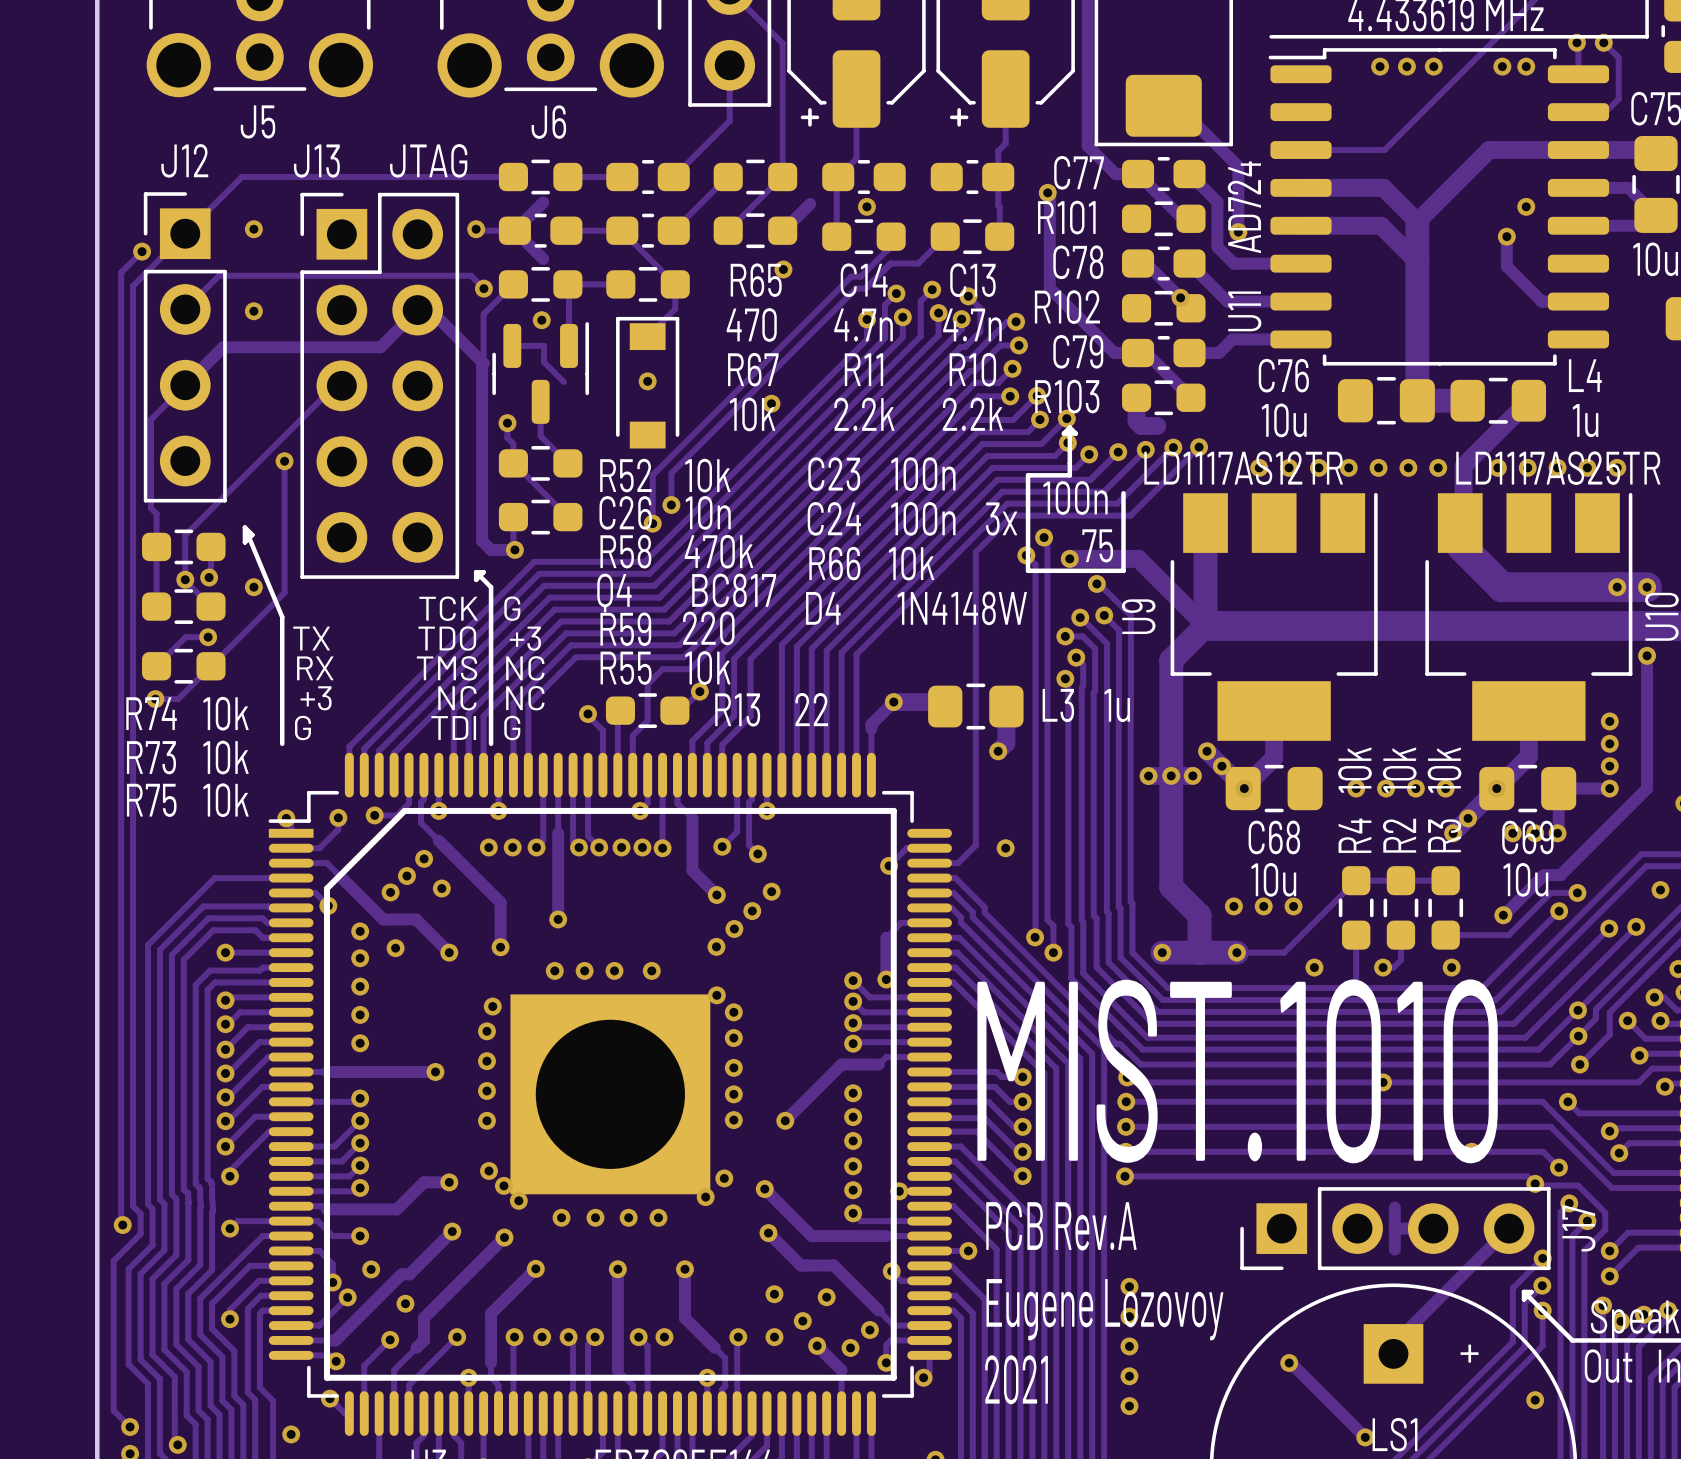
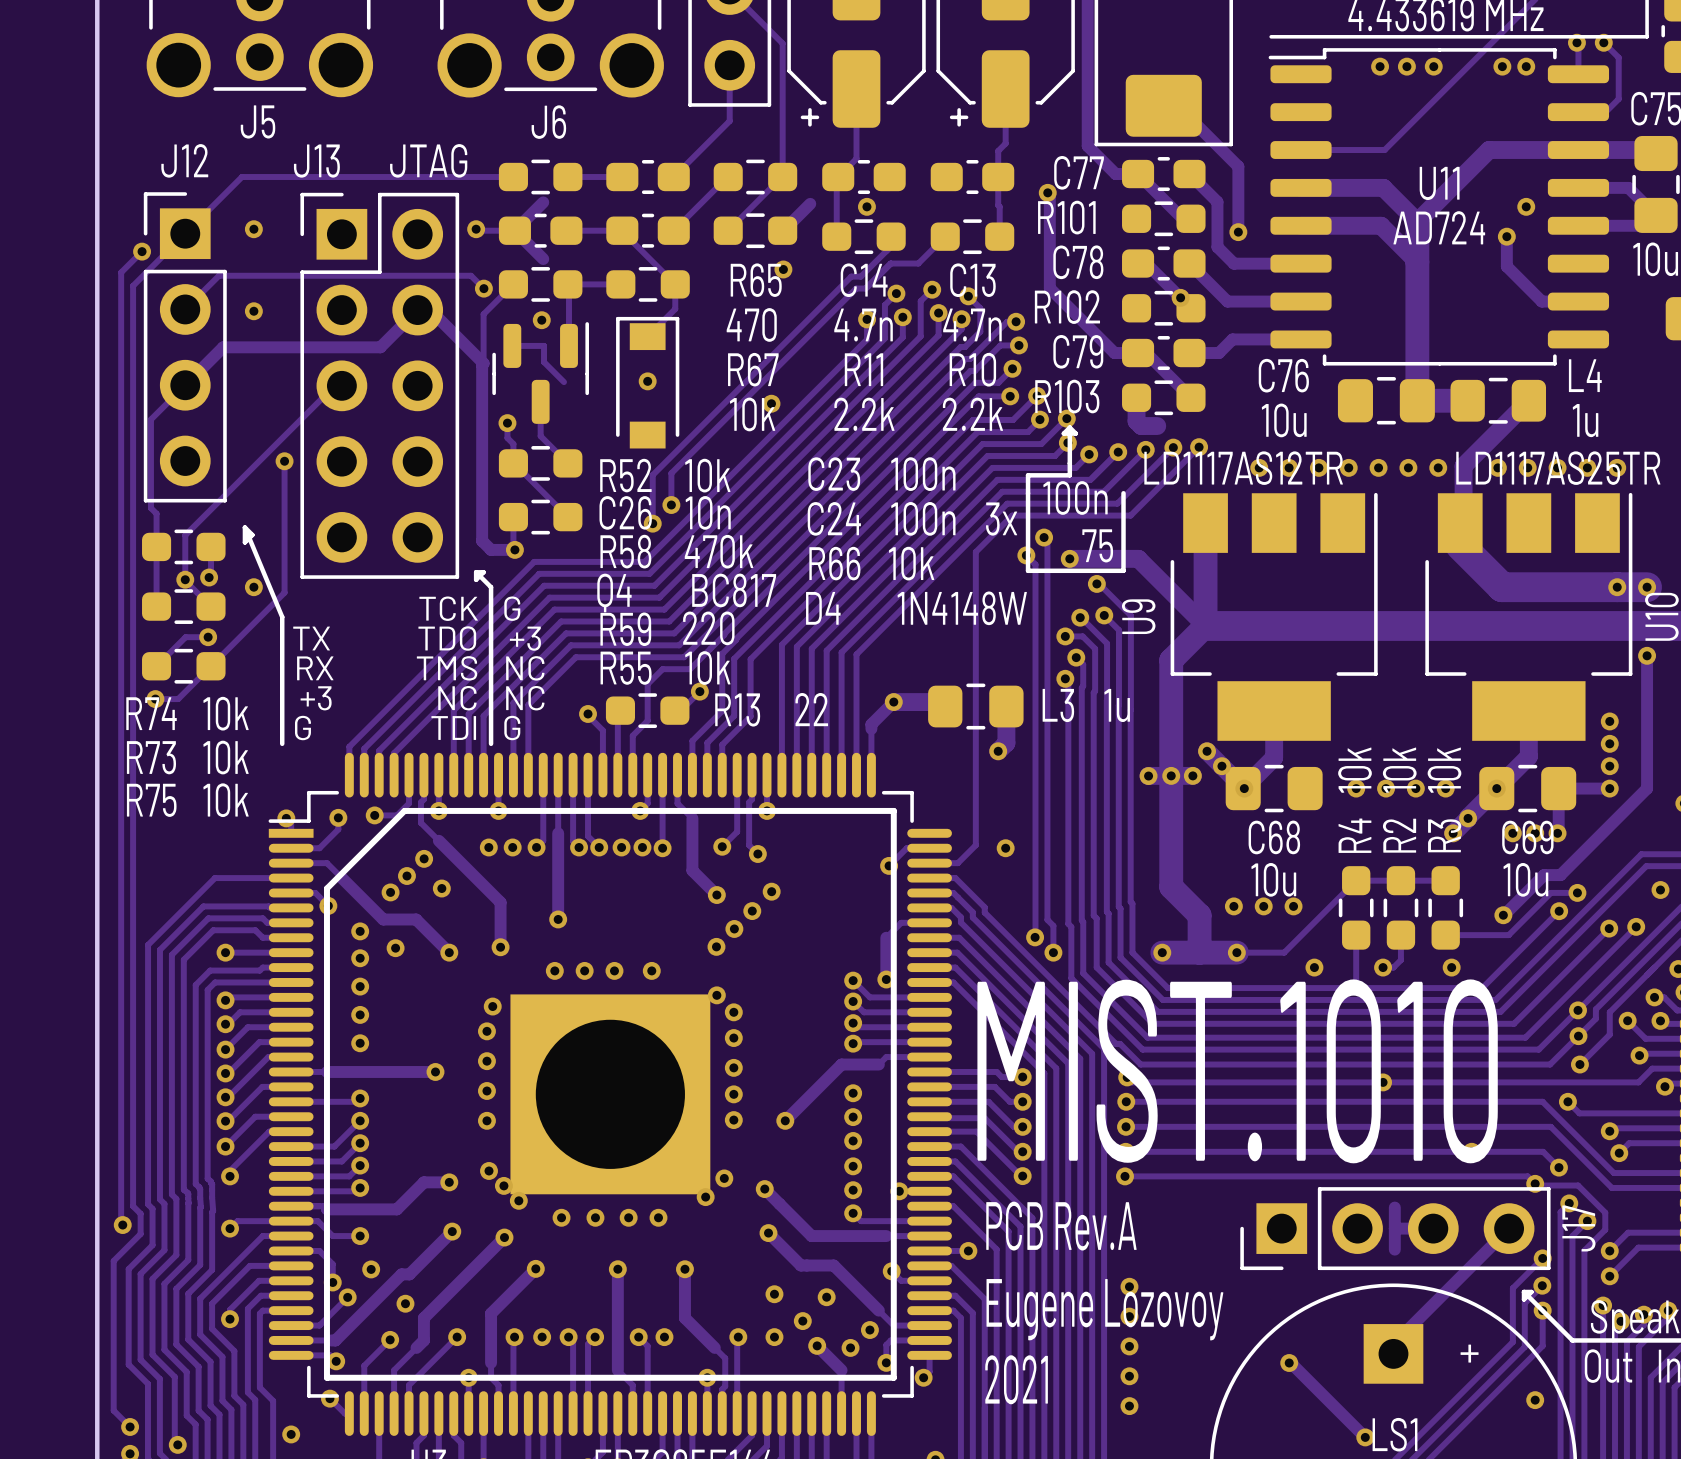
U11 value rotation: 0° (1244, 207) -> 90° clockwise (1439, 227)
U11 value position: AD724 (1244, 207) -> AD724 (1439, 227)
U11 name rotation: 0° (1244, 311) -> 90° clockwise (1439, 183)
U11 name position: U11 (1244, 311) -> U11 (1439, 183)

